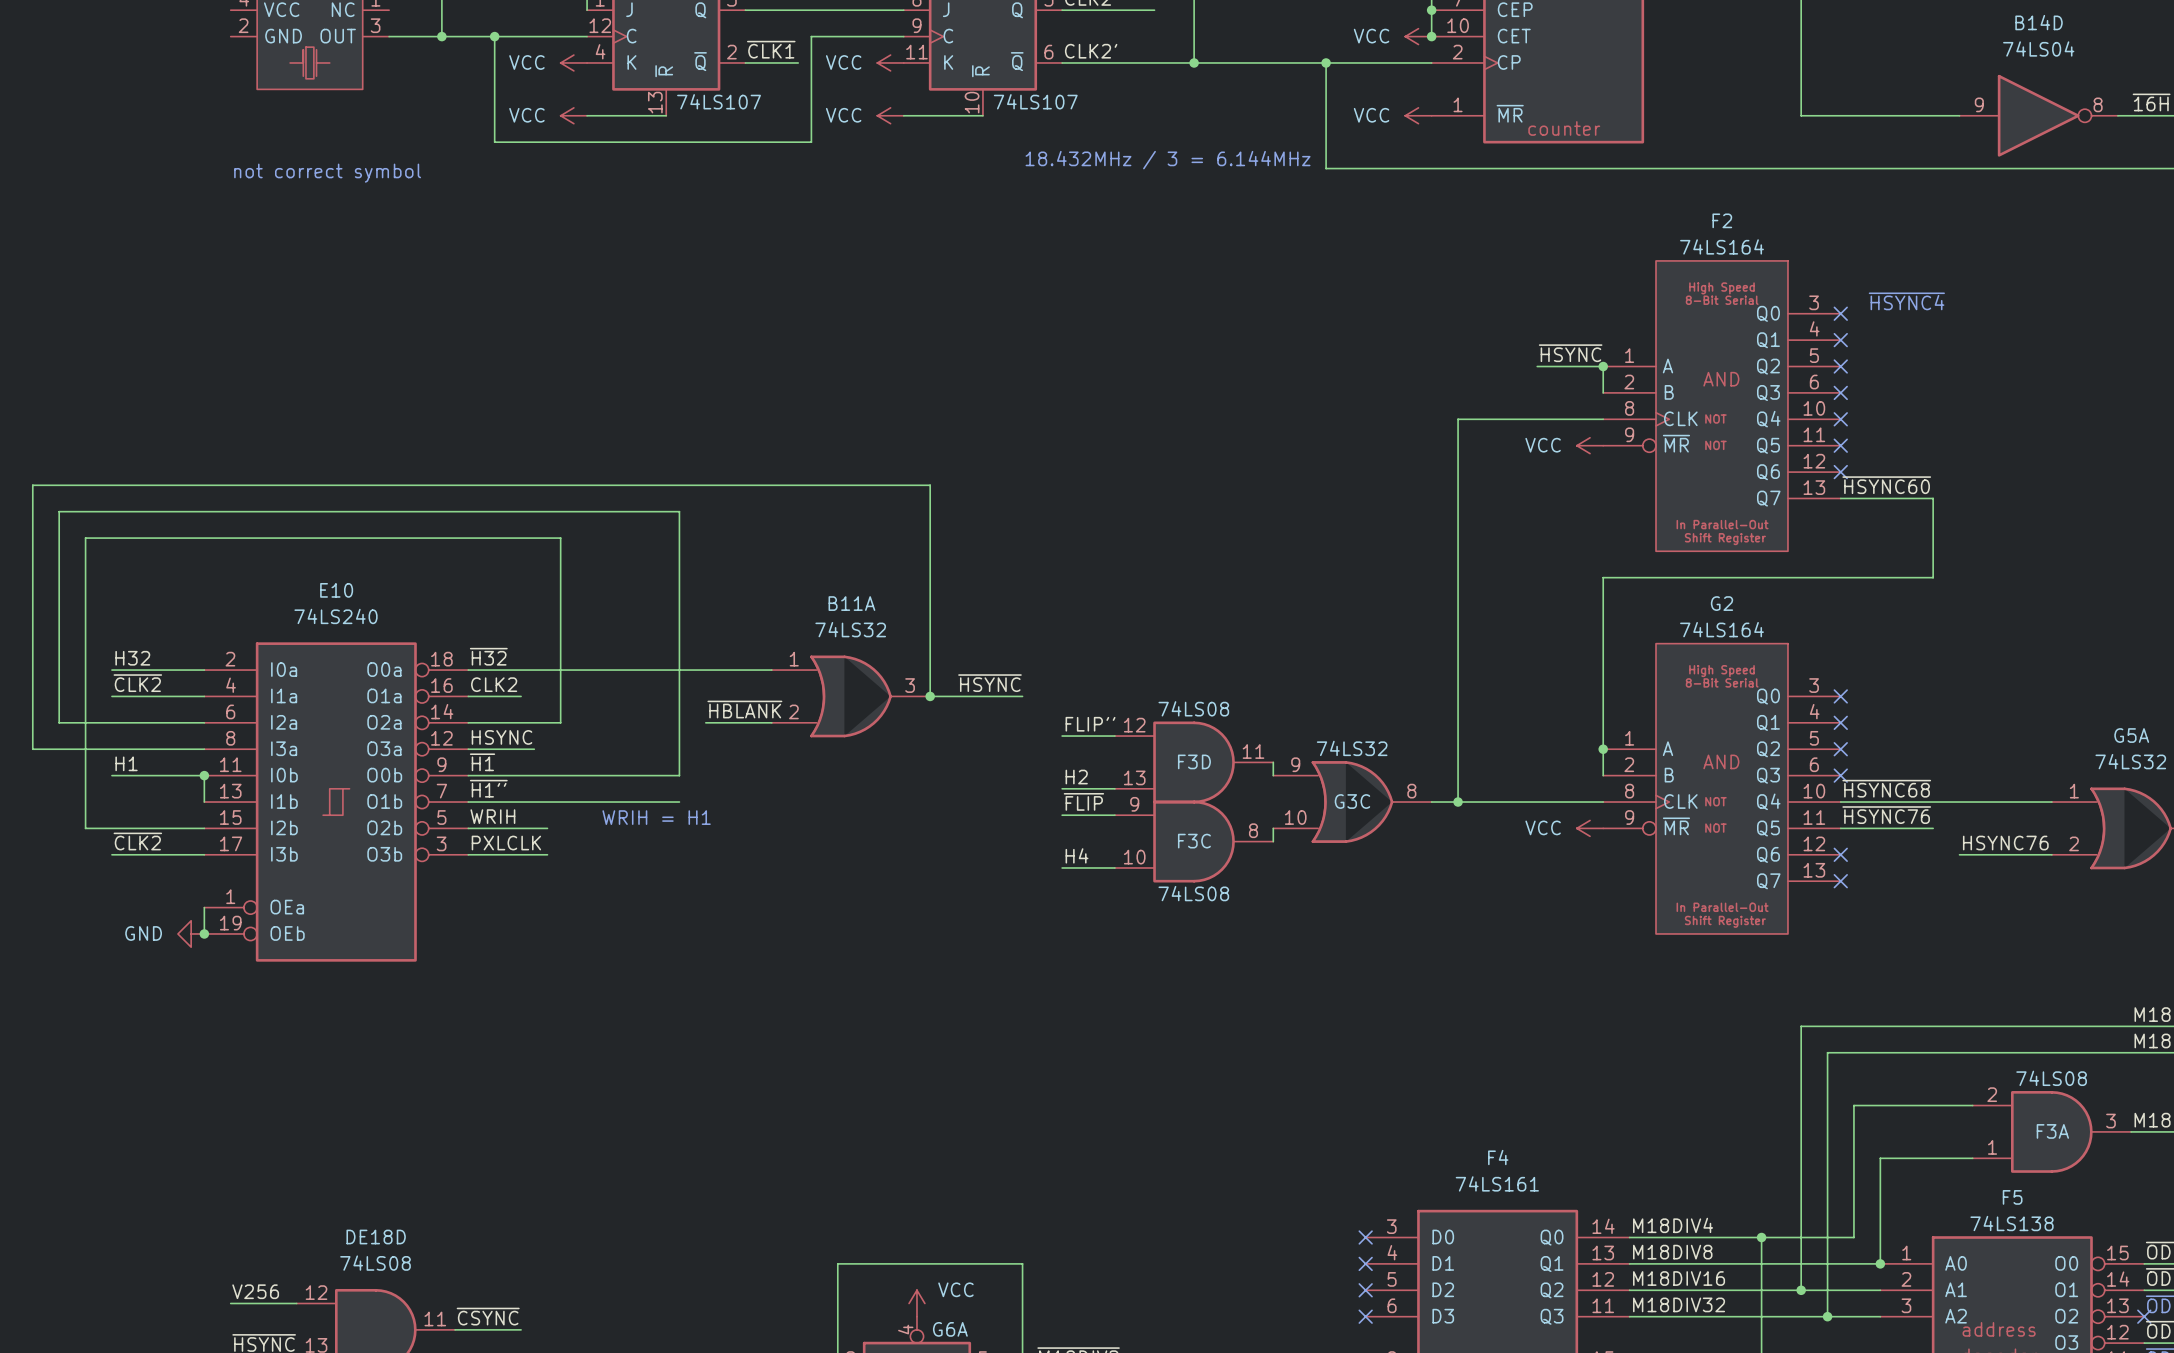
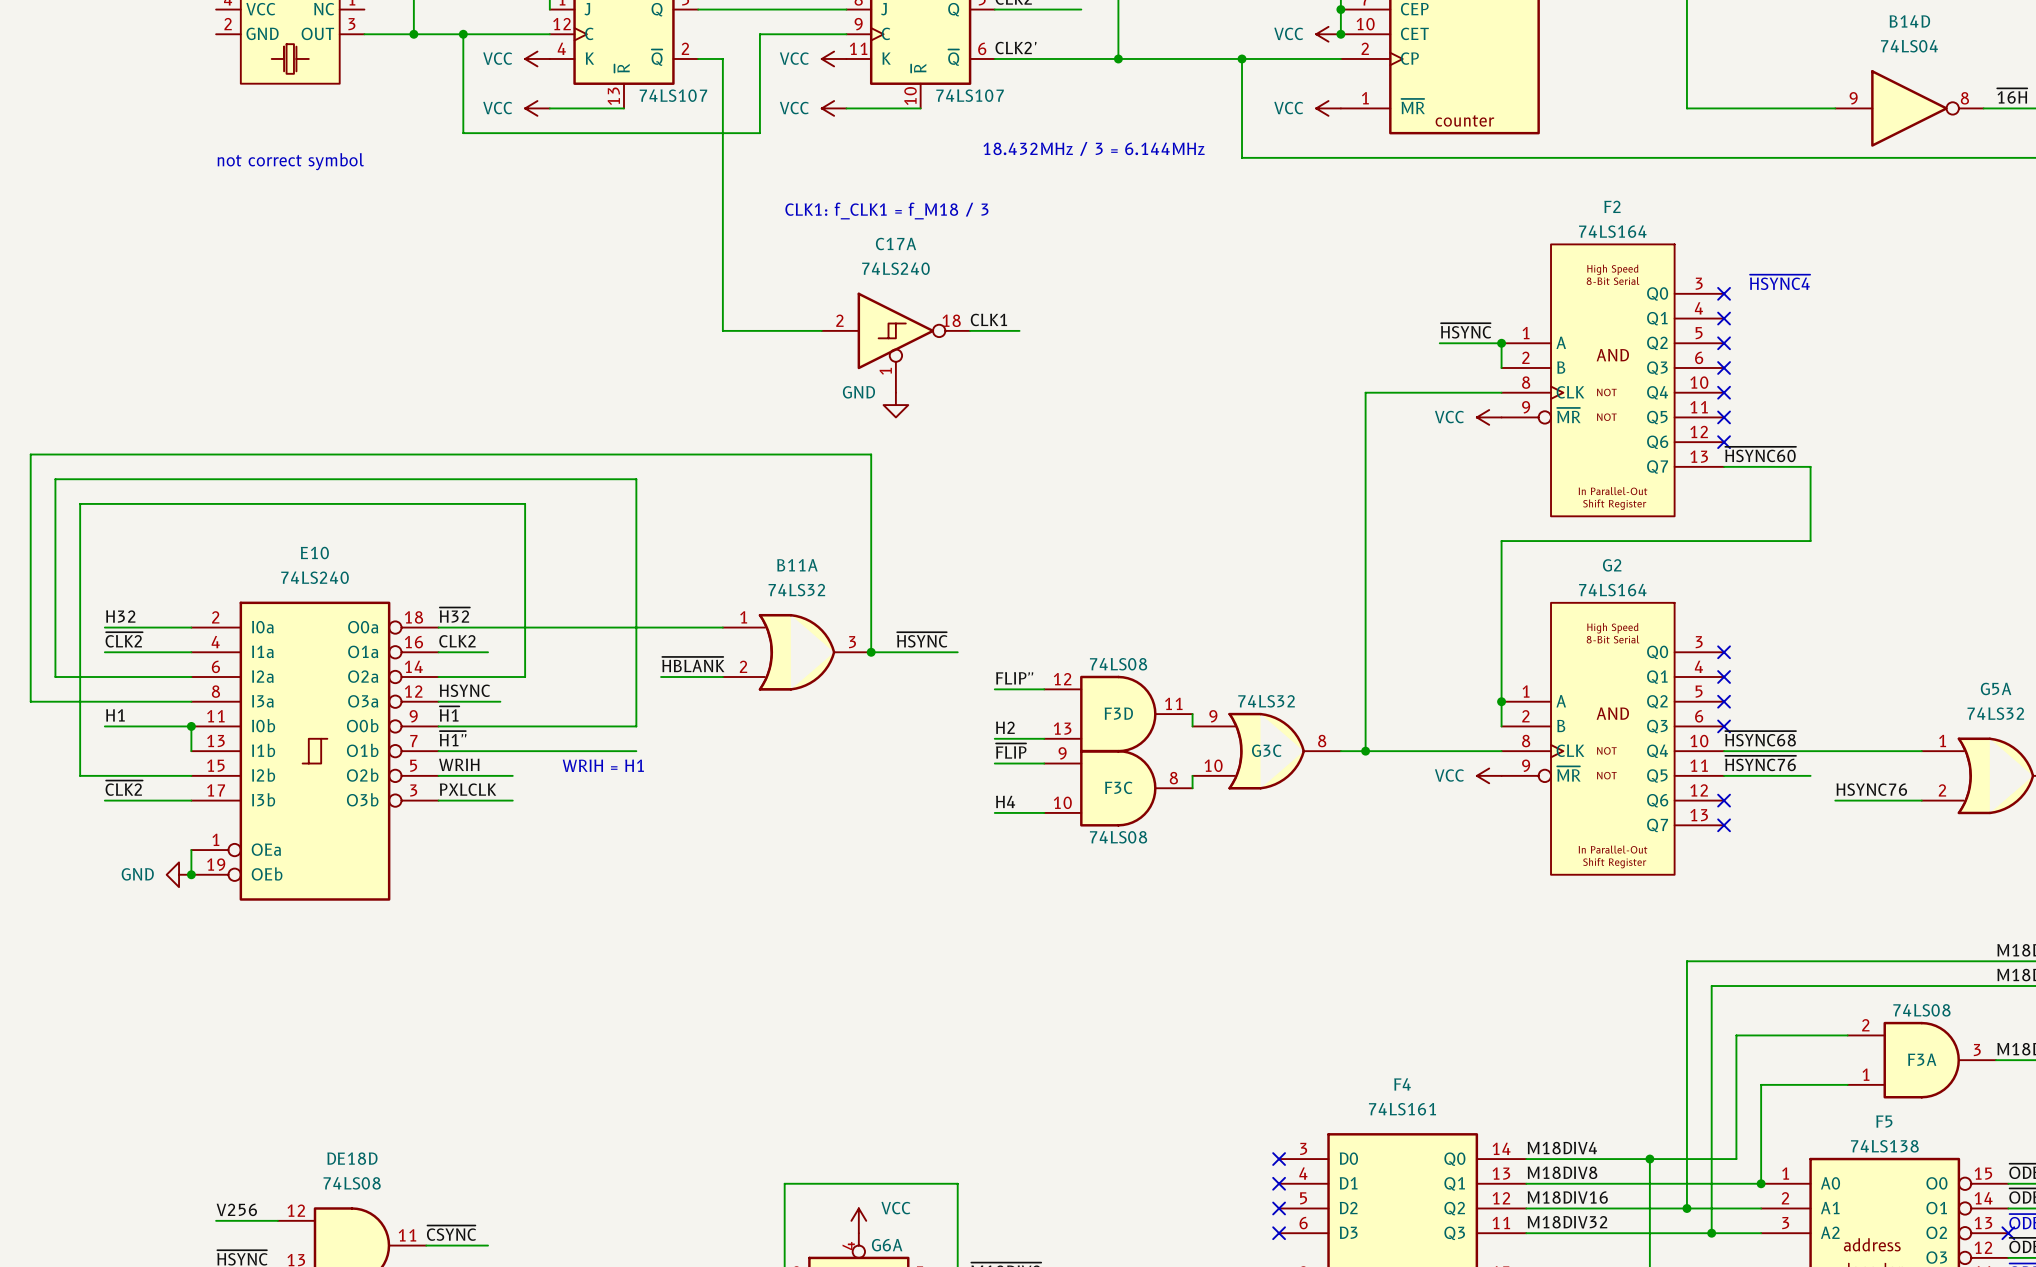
label: ~{CLK1} (771, 49) -> none
wire: (771, 62) (798, 62) -> (722, 58) (722, 330) (821, 330)
text: none -> CLK1: f_CLK1 = f_M18 / 3 (886, 211)
label: none -> CLK1 (988, 319)
wire: none -> (970, 330) (1019, 330)
C17A: none -> 74LS240 (895, 342)
power symbol: none -> GND (895, 405)

